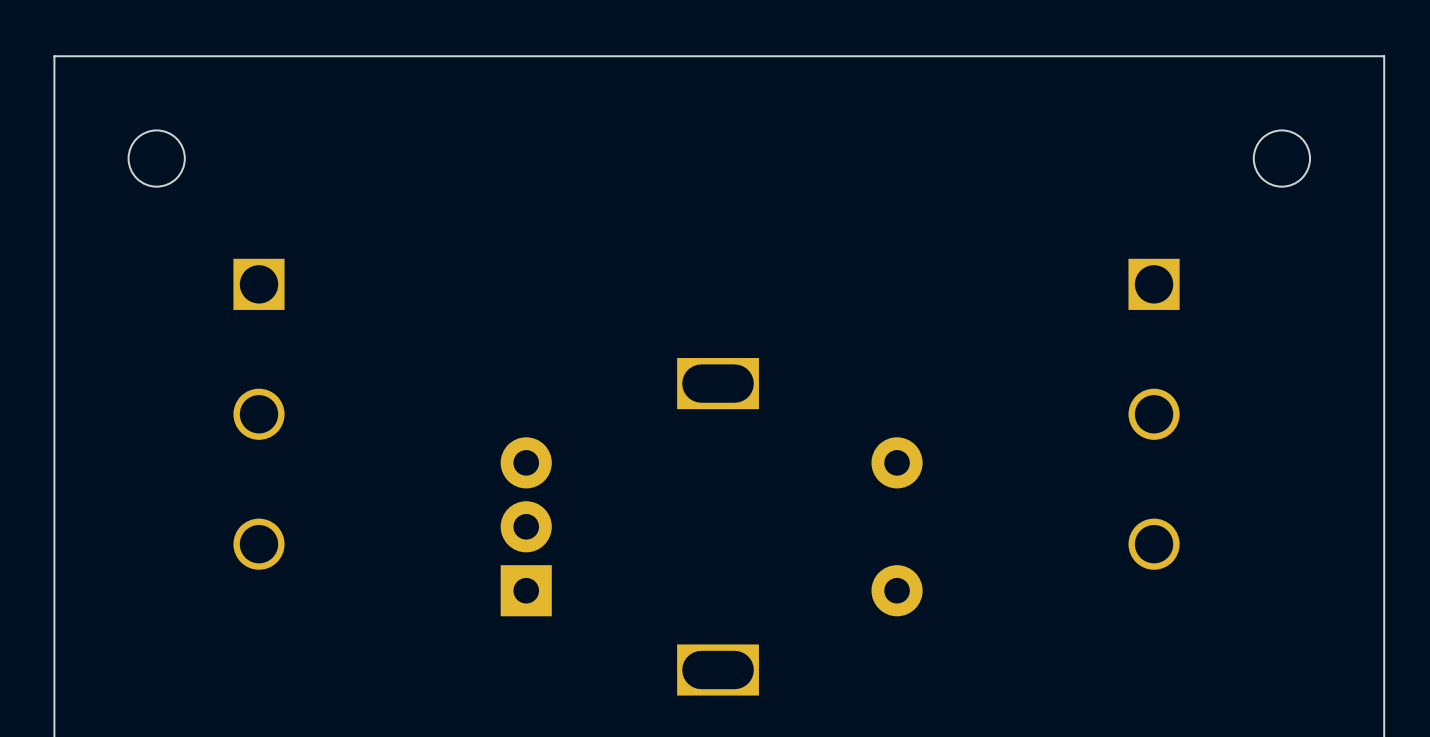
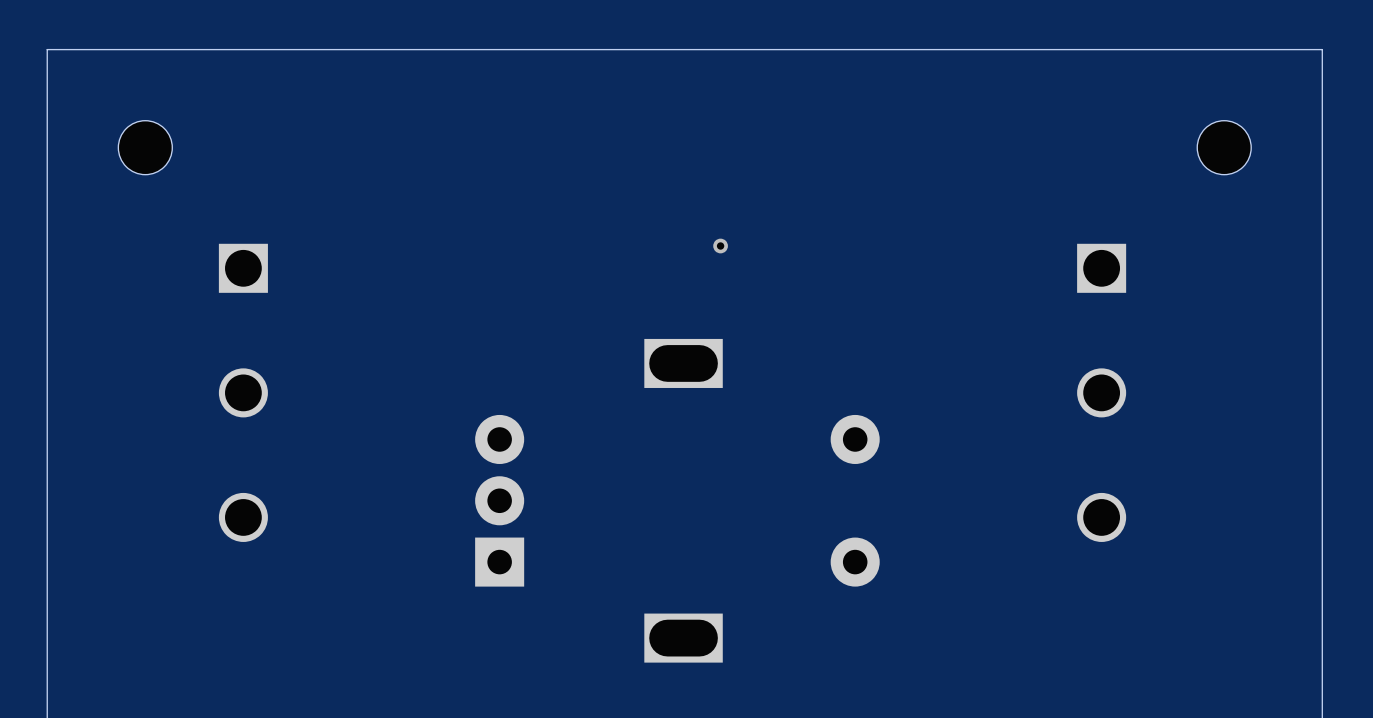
via: none -> (720, 246)

